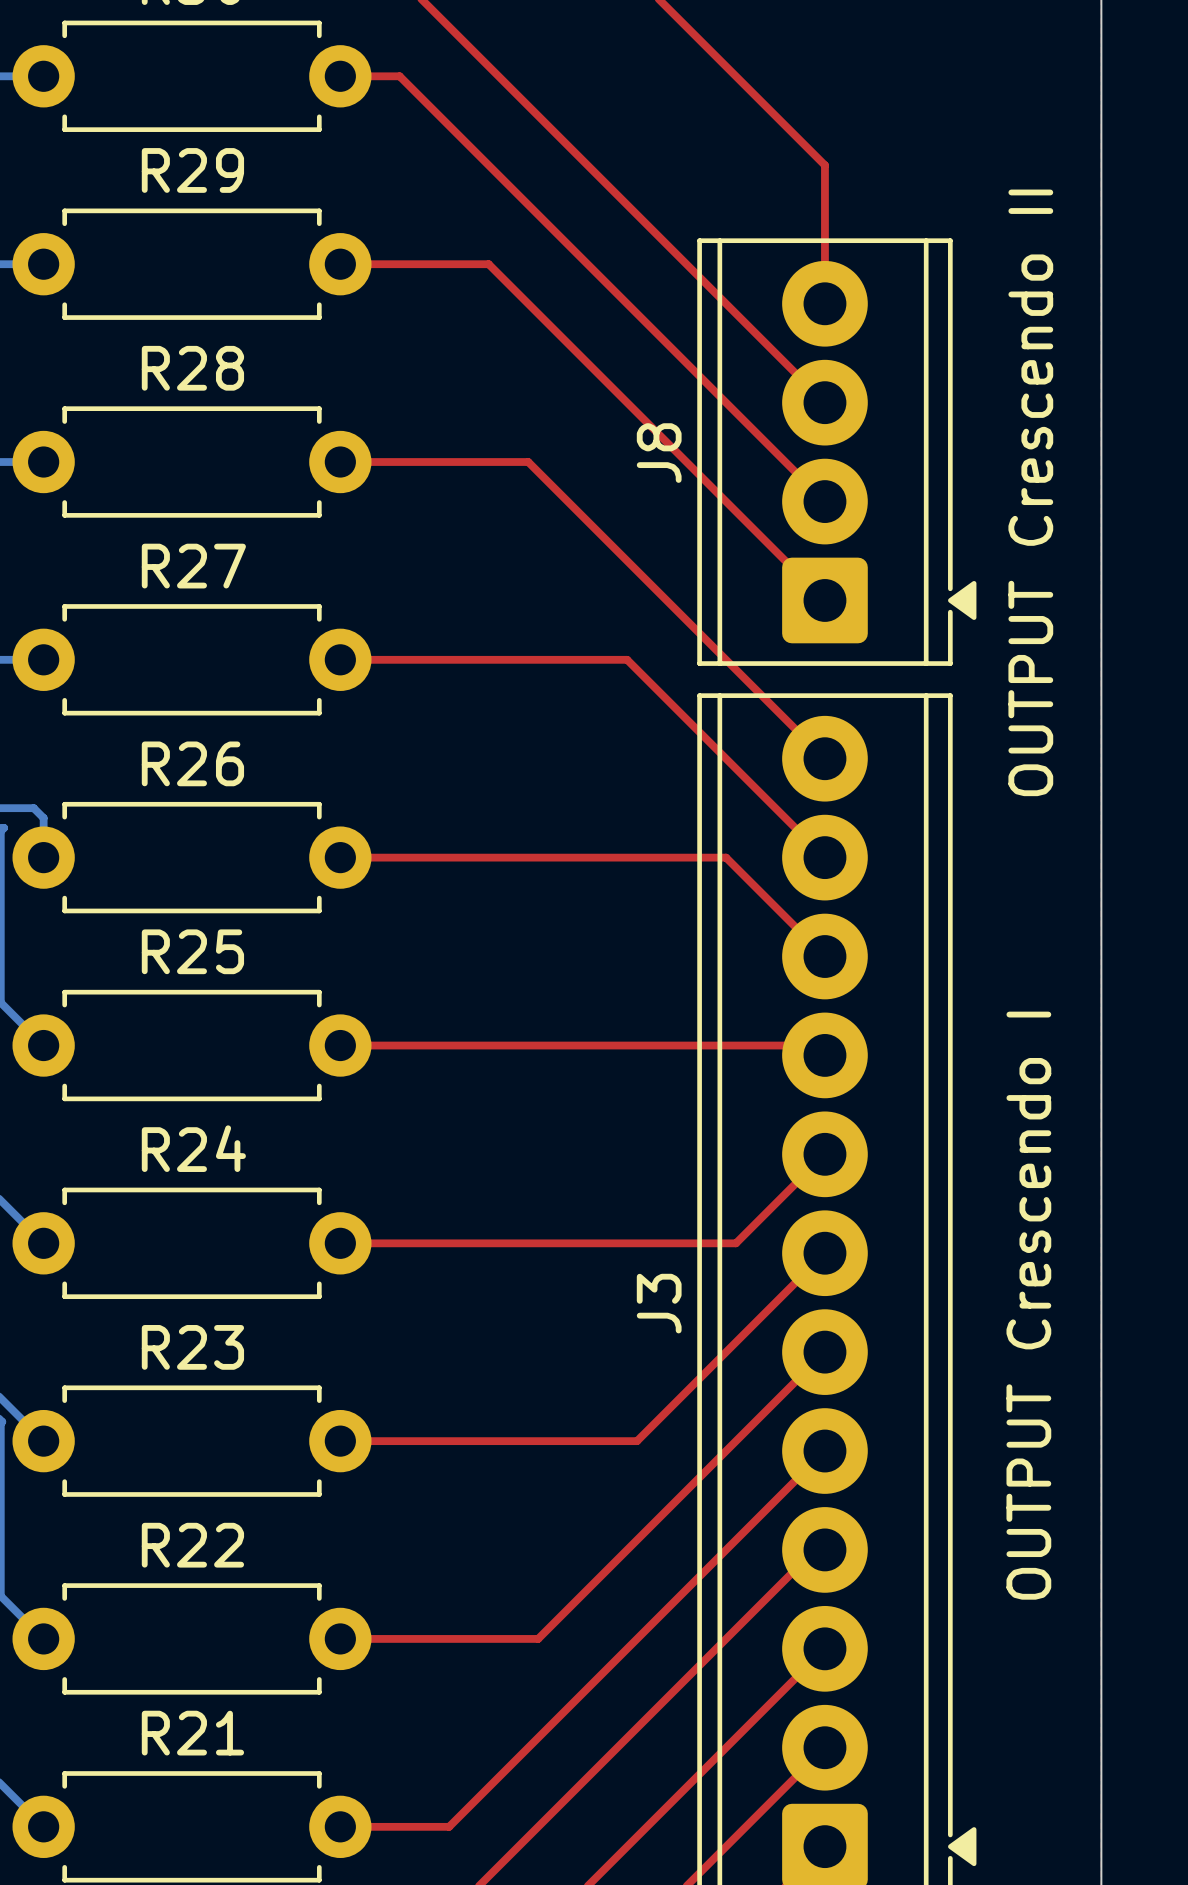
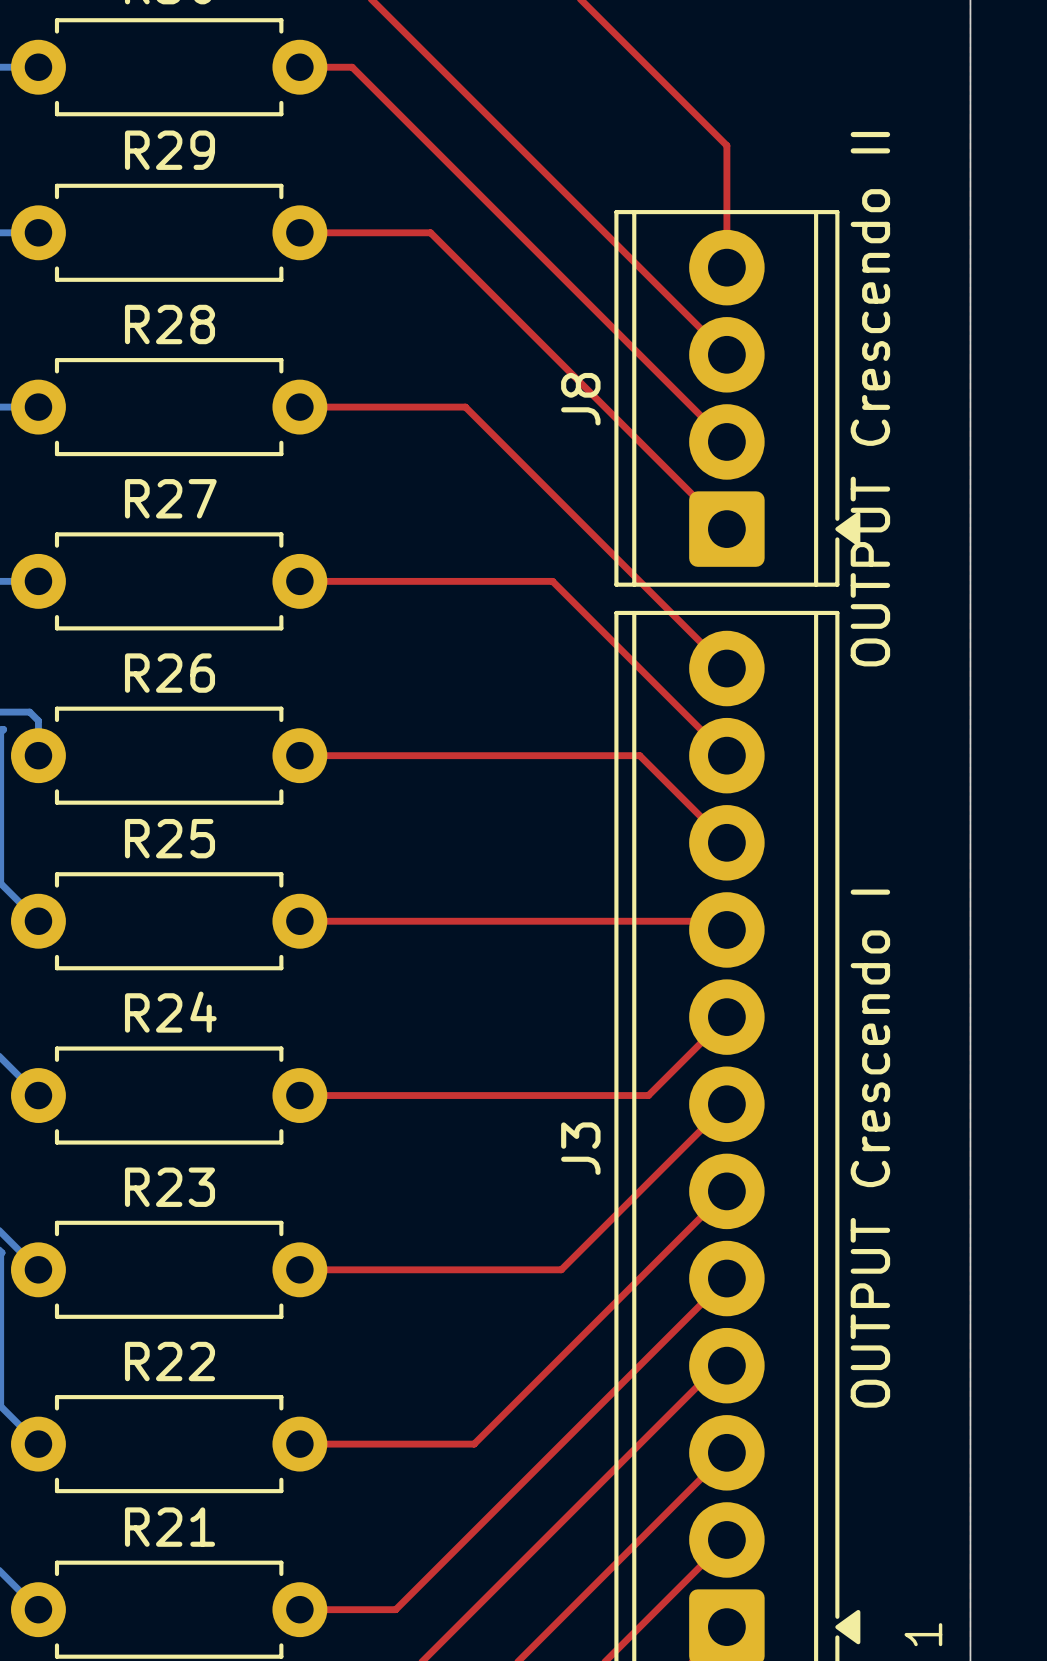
J8 value position: OUTPUT Crescendo II (1030, 492) -> OUTPUT Crescendo II (870, 399)
J3 value position: OUTPUT Crescendo I (1028, 1305) -> OUTPUT Crescendo I (870, 1148)
text: none -> 1 (923, 1634)

